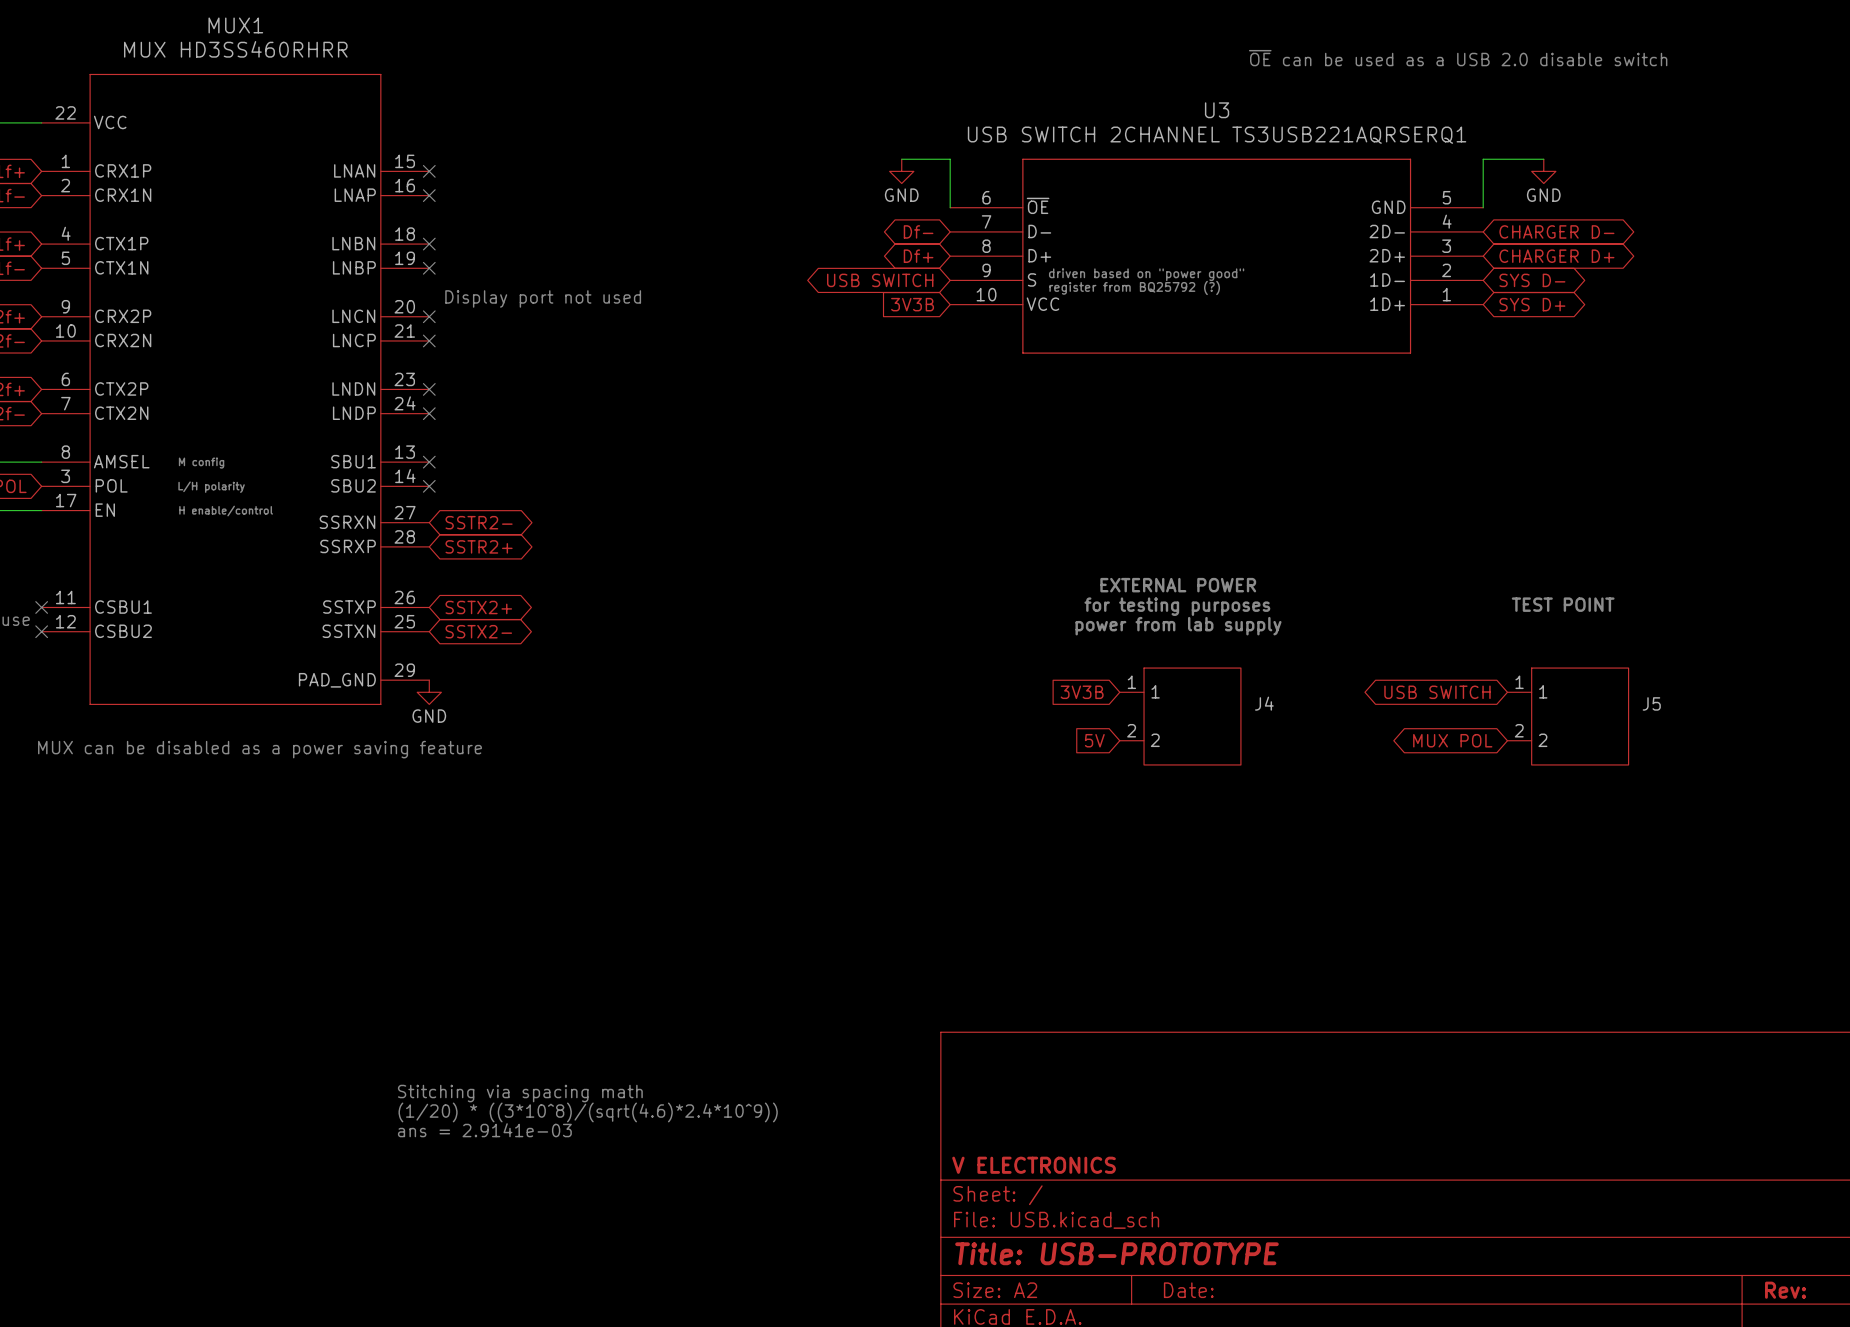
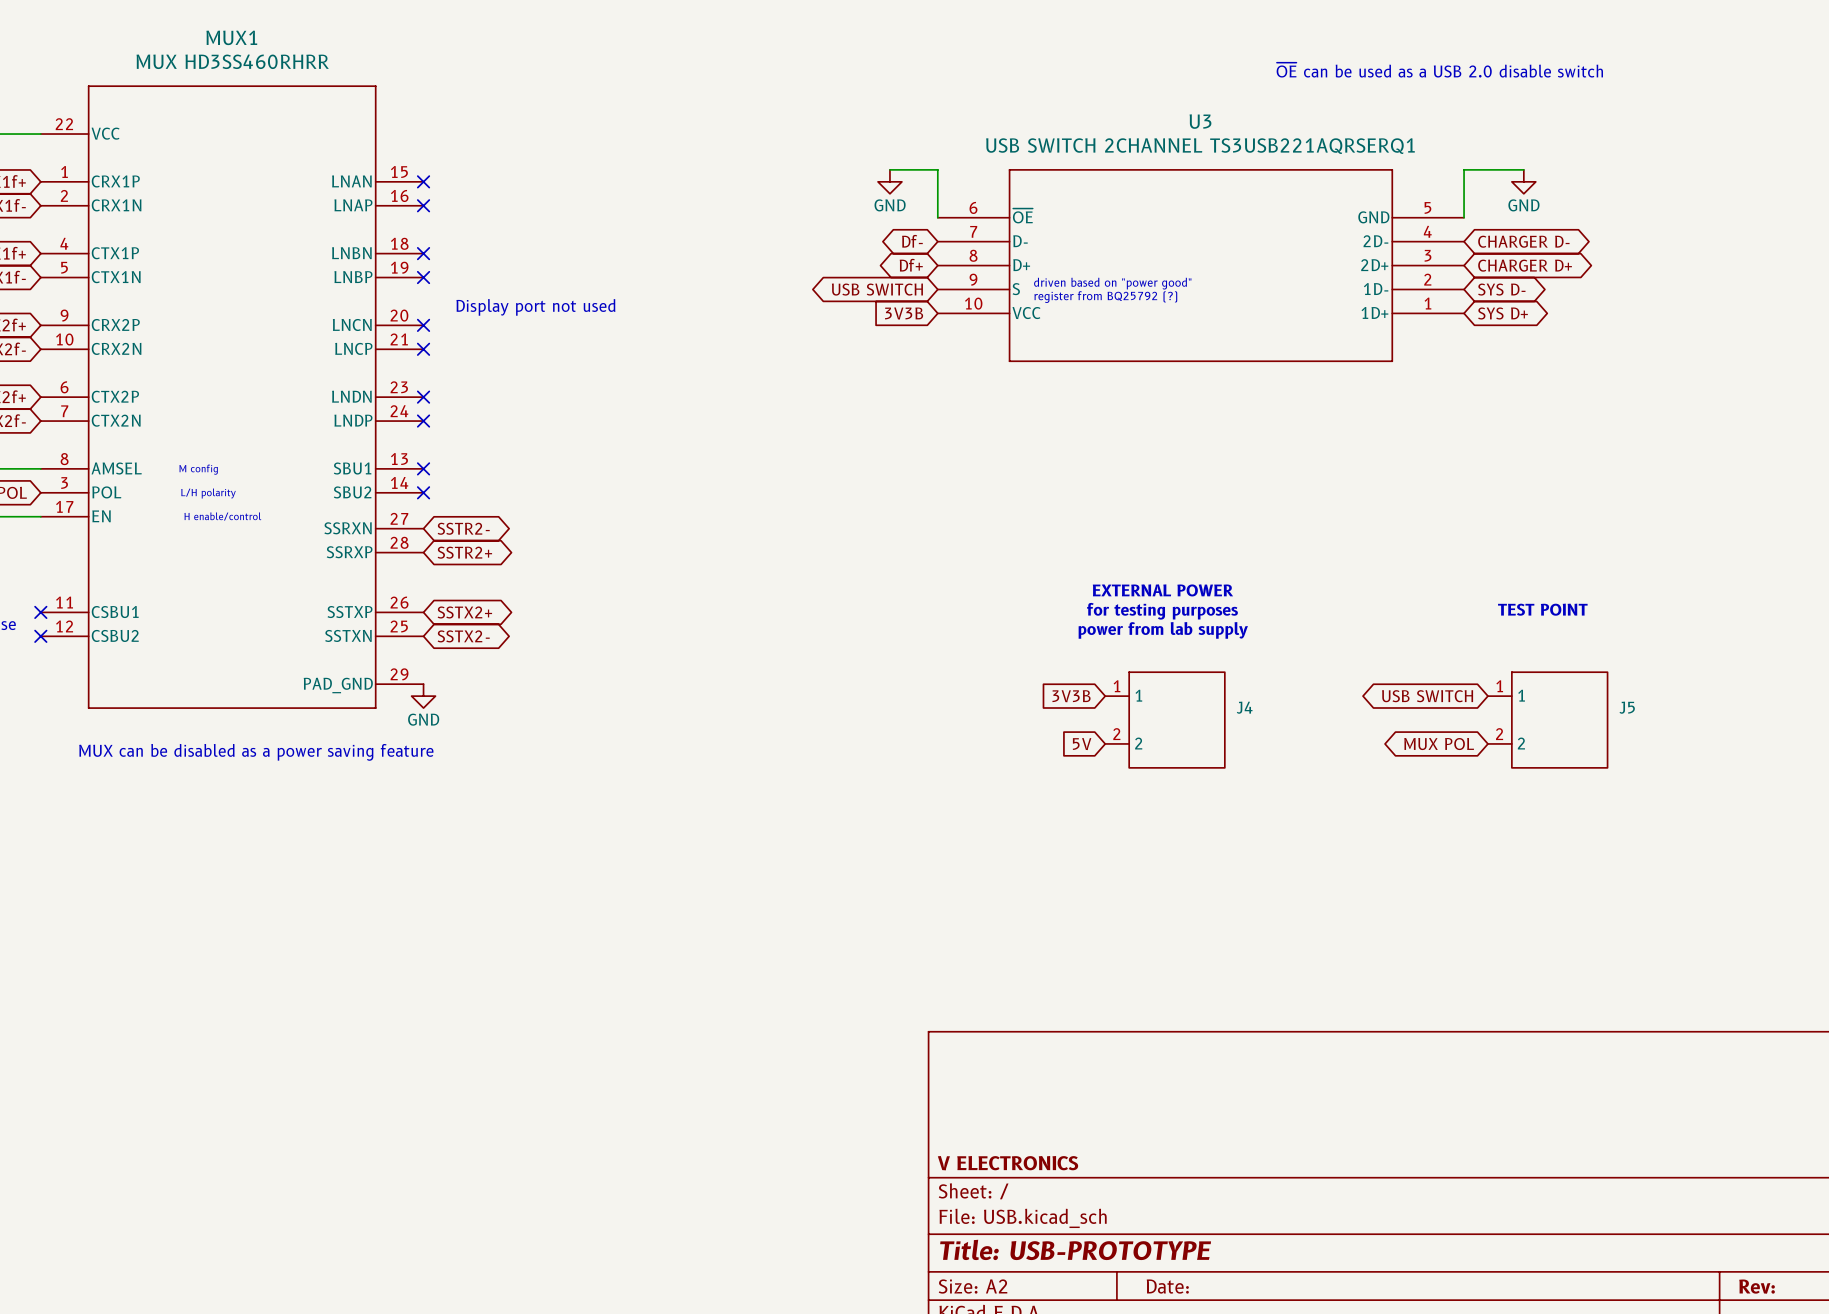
text: Stitching via spacing math (520, 1093) -> none
text: (1/20) * ((3*10^8)/(sqrt(4.6)*2.4*10^9)) (588, 1112) -> none
text: ans = 2.9141e-03 (484, 1130) -> none

